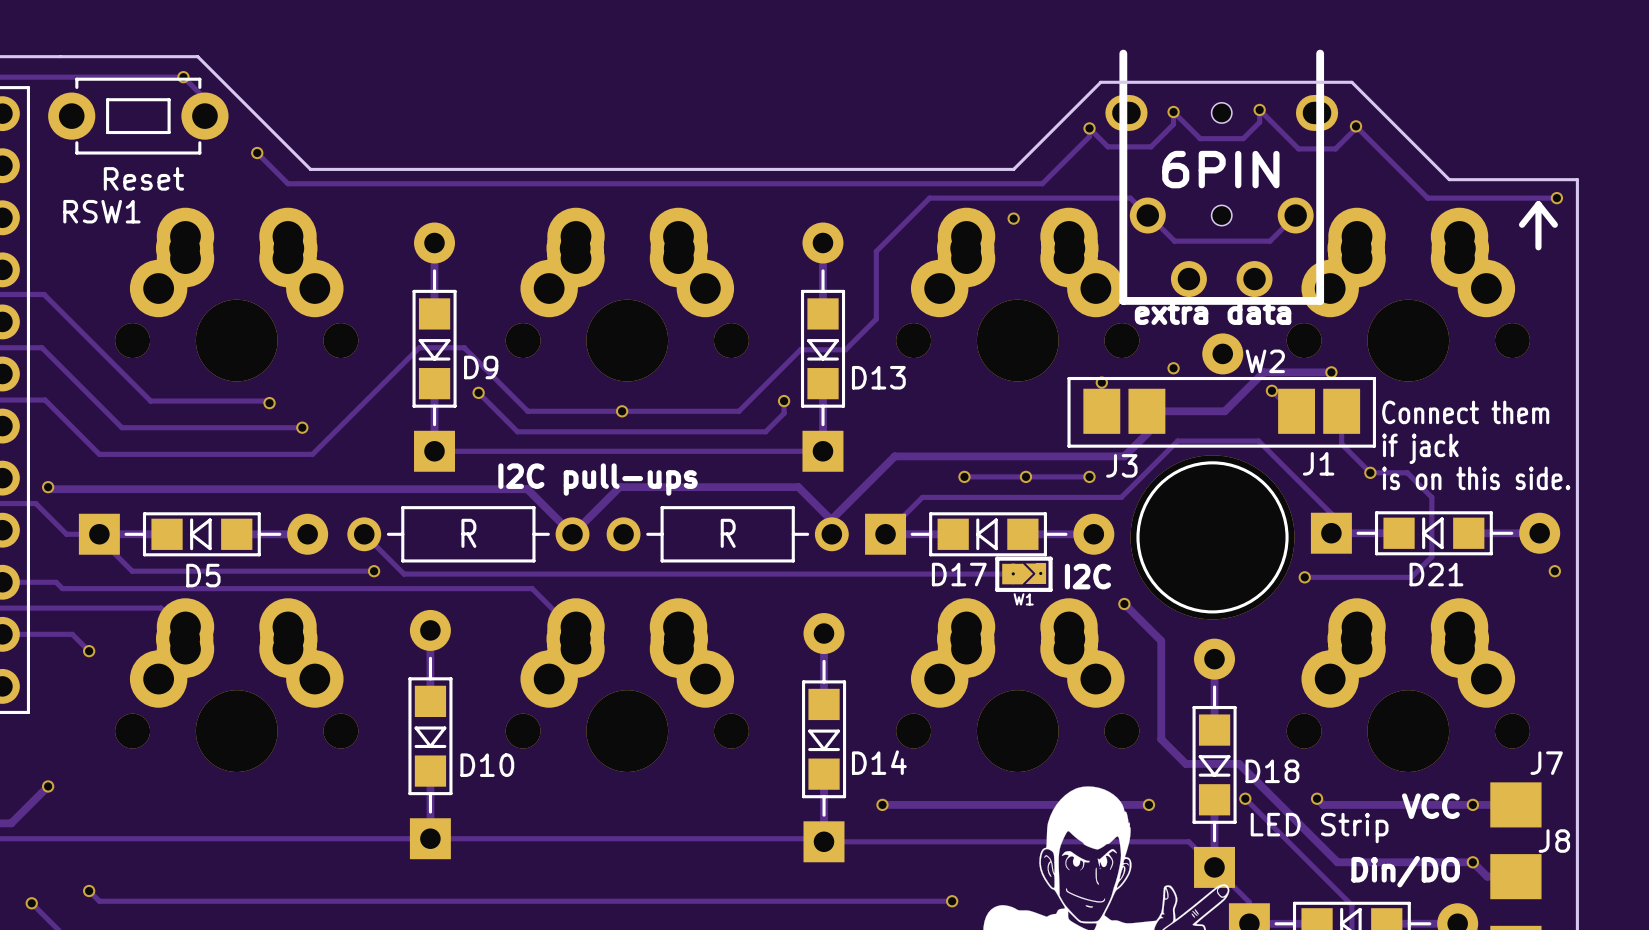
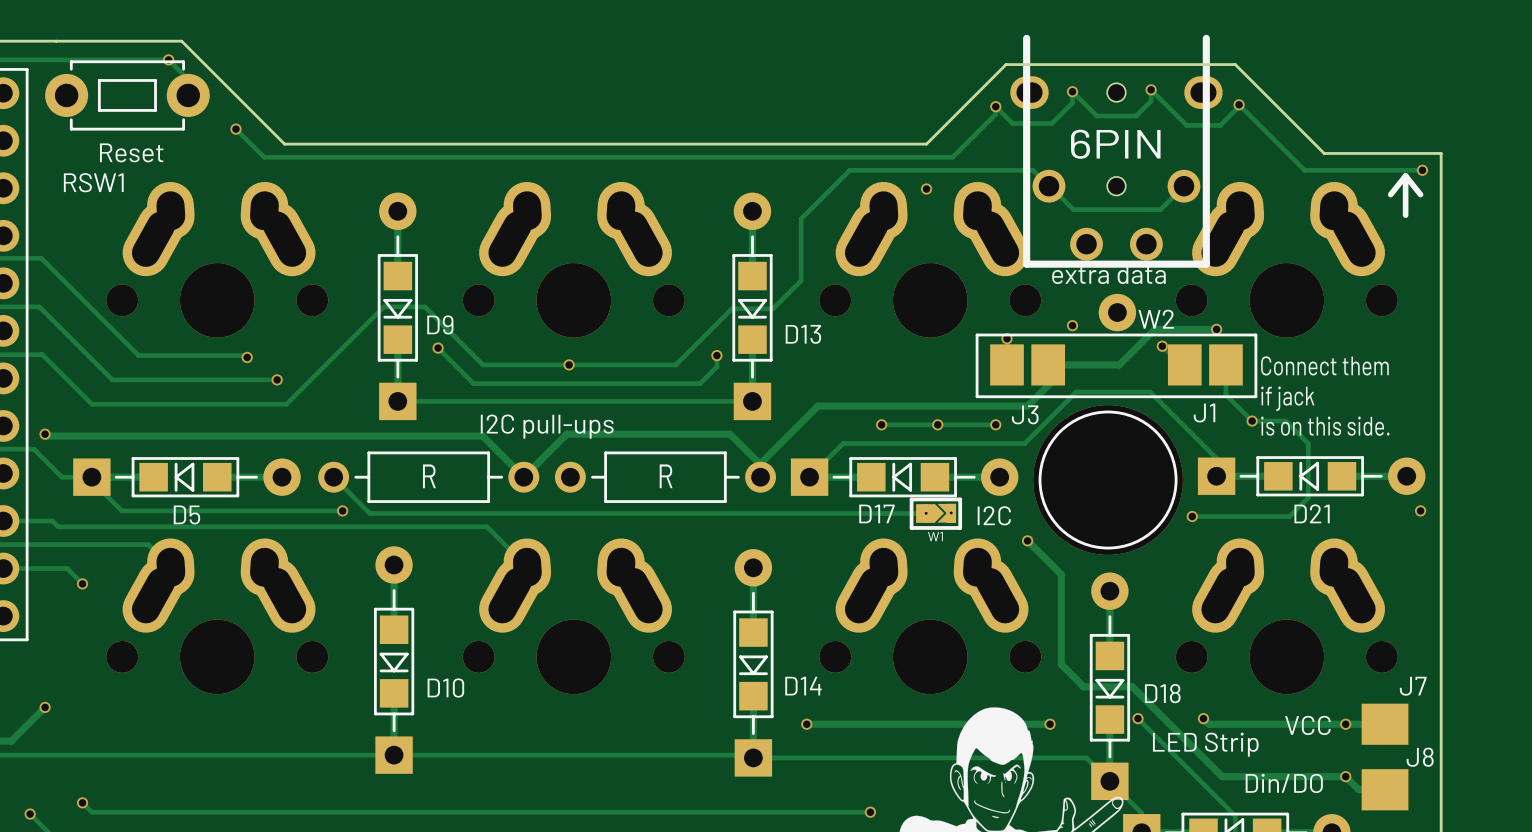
part footprint: [115, 207, 359, 382] -> [106, 181, 329, 338]
part footprint: [505, 207, 749, 382] -> [462, 181, 685, 338]
part footprint: [896, 207, 1140, 382] -> [819, 181, 1042, 338]
part footprint: [1286, 207, 1530, 382] -> [1175, 181, 1398, 338]
part footprint: [115, 598, 359, 772] -> [106, 538, 329, 695]
part footprint: [505, 598, 749, 772] -> [462, 538, 685, 695]
part footprint: [896, 598, 1140, 772] -> [819, 538, 1042, 695]
part footprint: [1286, 598, 1530, 772] -> [1175, 538, 1398, 695]

